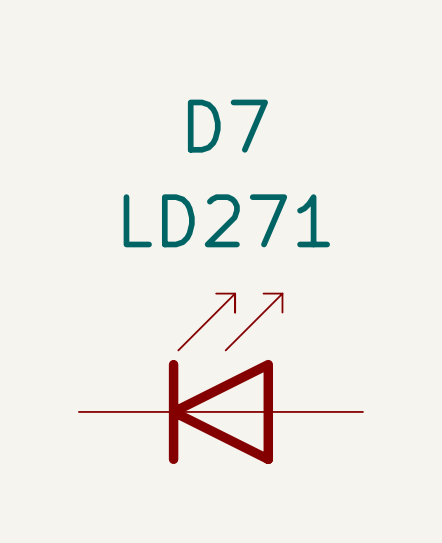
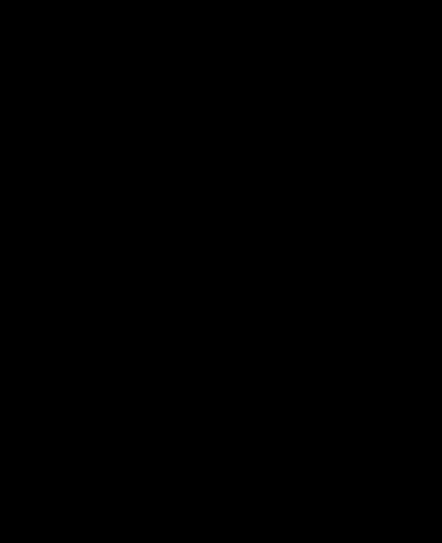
D7: LD271 (220, 378) -> none

